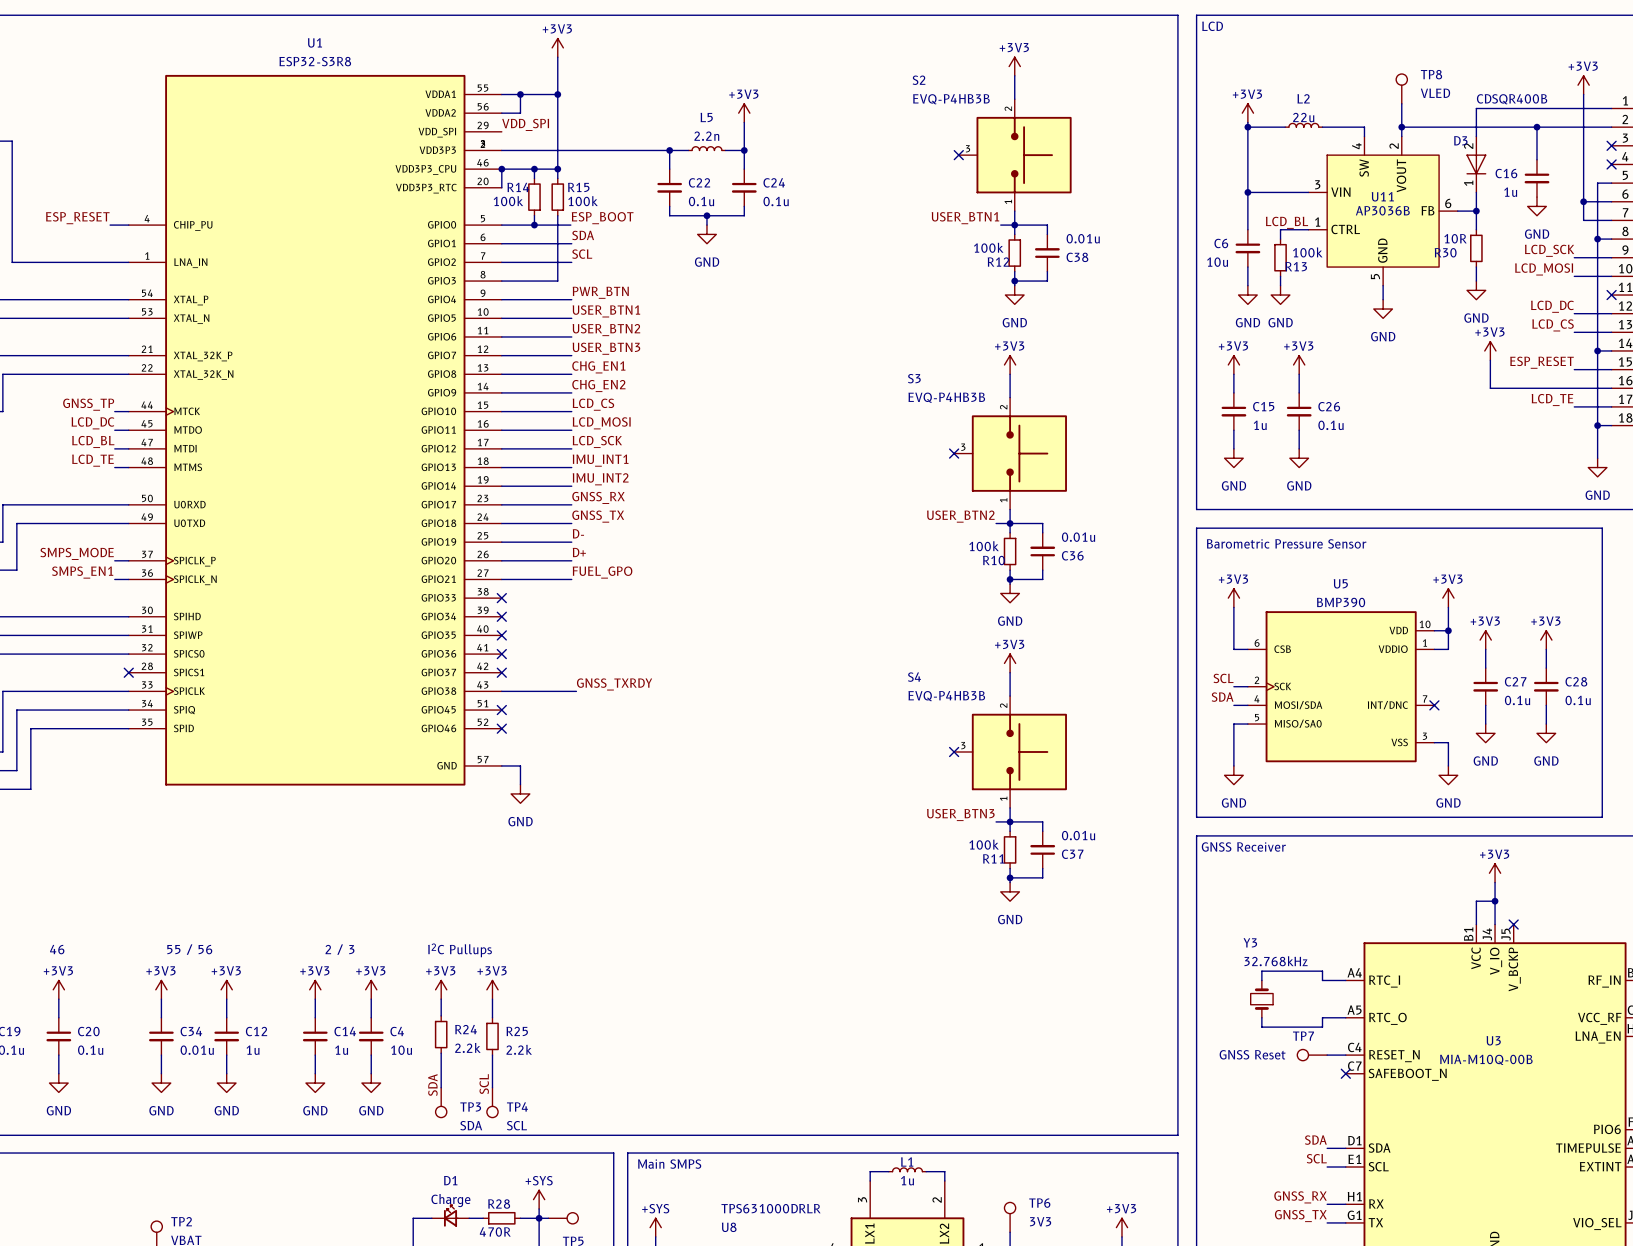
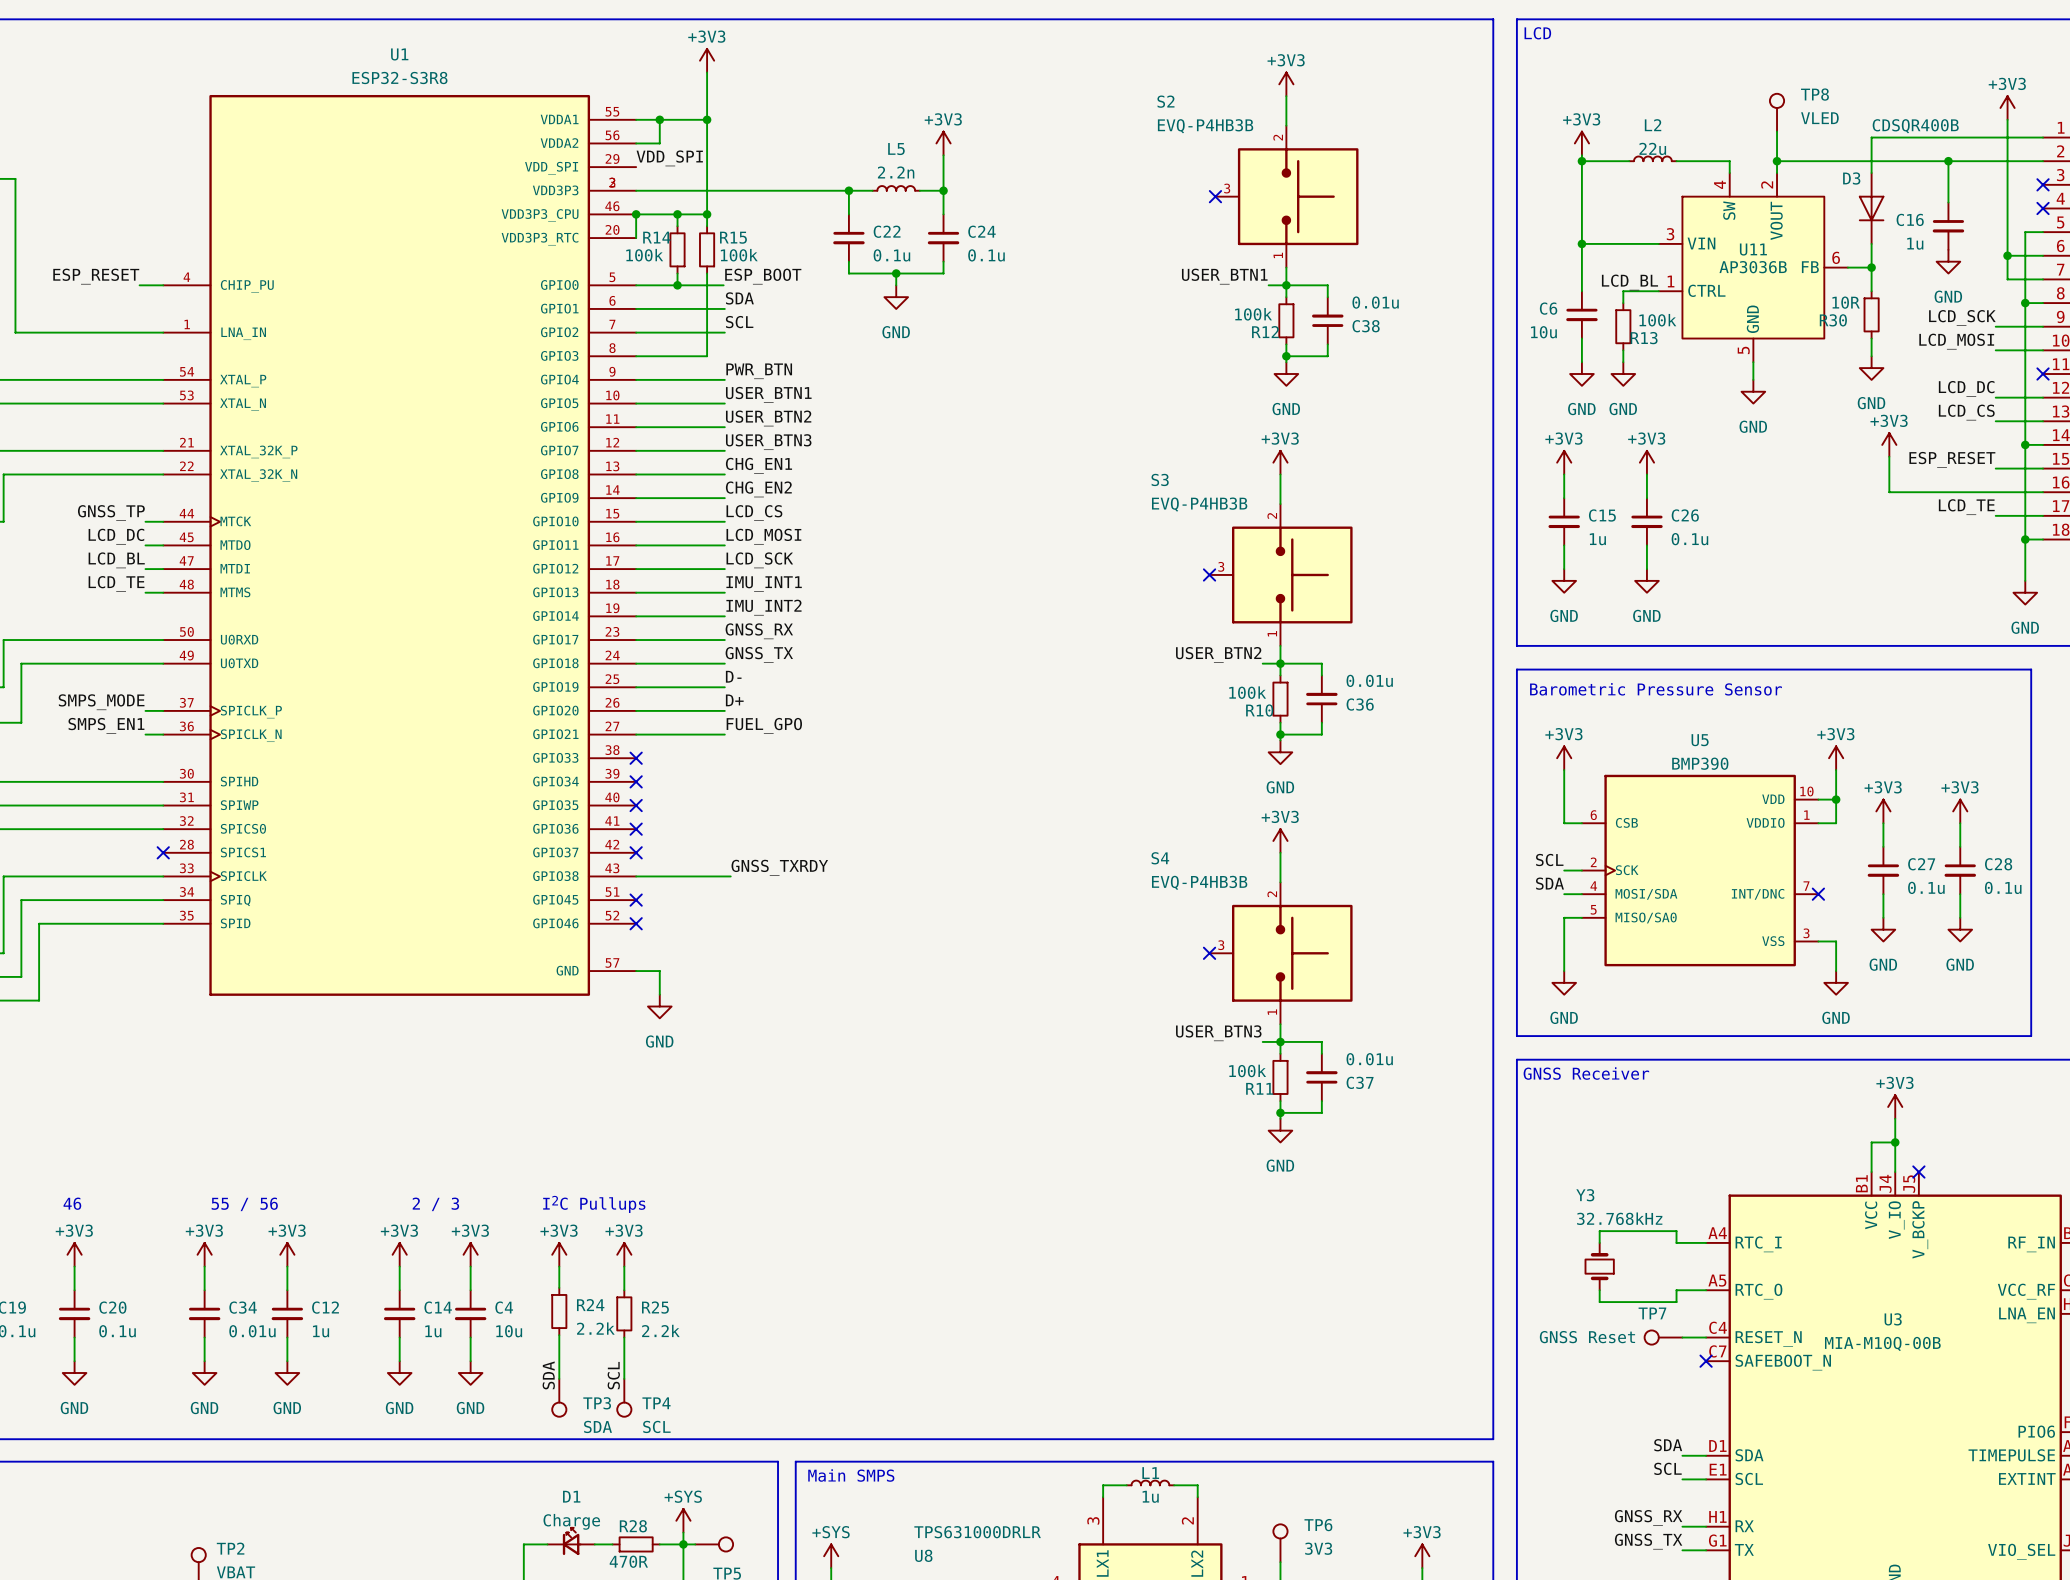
D3 pin number: 2 (1468, 146) -> none
D3 pin number: 1 (1468, 183) -> none

